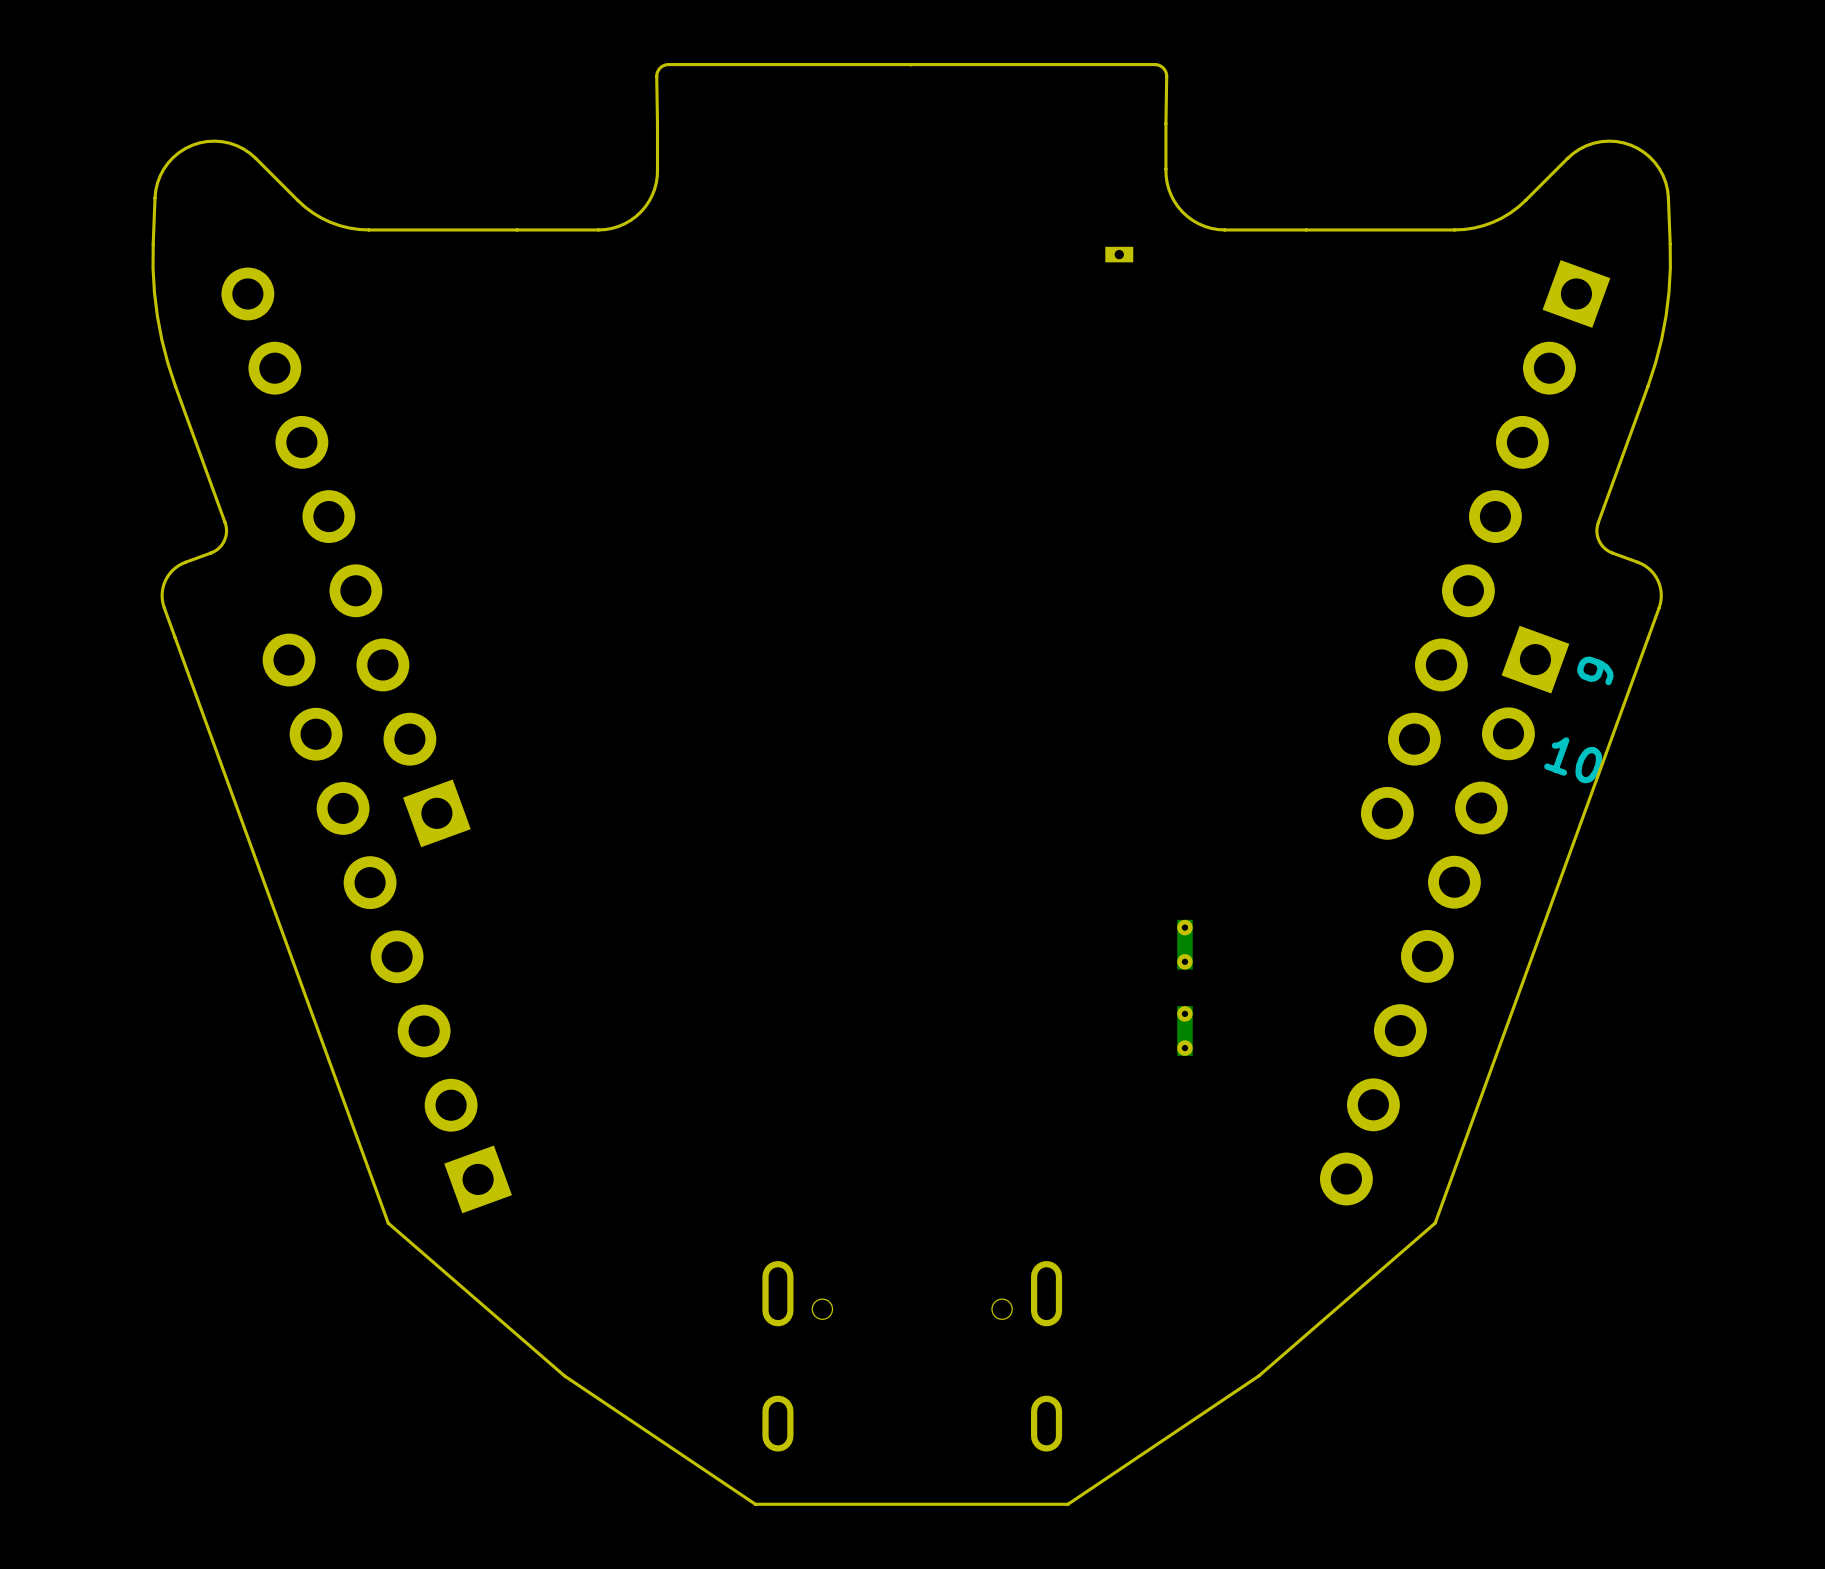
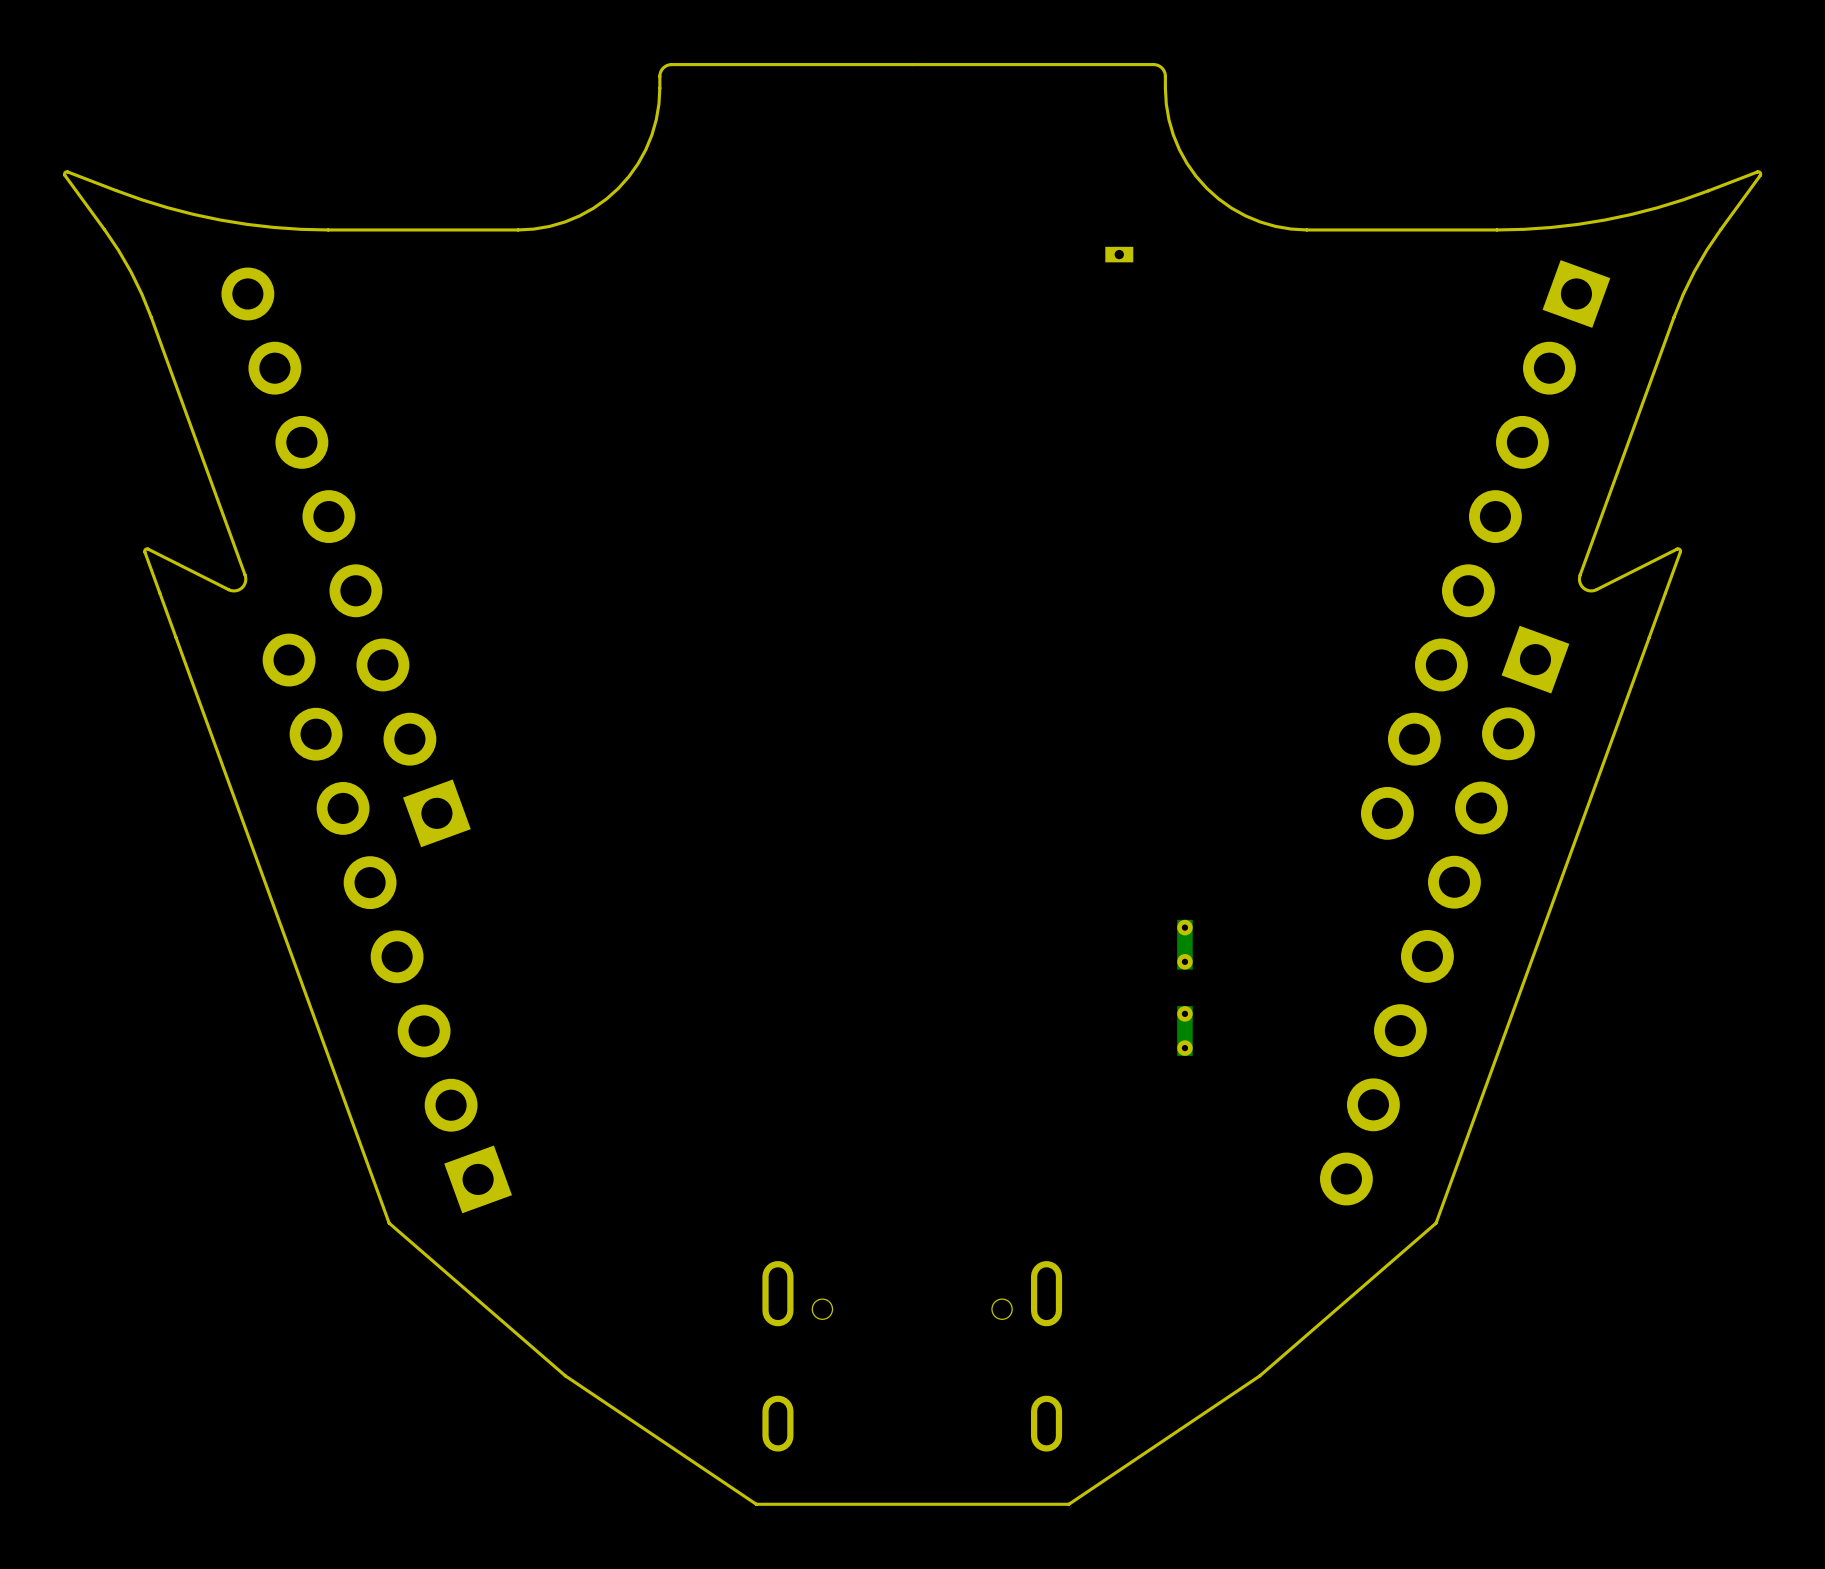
board edge: (671, 64) (662, 66) (656, 73) (657, 175) (652, 195) (640, 212) (624, 223) (605, 229) (518, 229) -> (671, 64) (664, 67) (660, 73) (656, 119) (645, 149) (638, 163) (618, 188) (593, 208) (579, 215) (549, 226) (518, 229)
board edge: (1153, 64) (1162, 67) (1166, 73) (1166, 175) (1171, 195) (1182, 211) (1198, 223) (1217, 229) (1306, 229) -> (1153, 64) (1160, 67) (1164, 72) (1168, 119) (1179, 149) (1196, 176) (1206, 188) (1218, 198) (1245, 215) (1275, 226) (1306, 229)
board edge: (368, 229) (339, 225) (313, 213) (250, 153) (229, 143) (207, 141) (192, 145) (179, 152) (163, 169) (157, 182) (155, 197) (153, 268) (157, 316) (167, 363) (226, 530) (224, 540) (217, 549) (181, 563) (169, 573) (162, 592) (164, 607) (388, 1223) (564, 1375) (756, 1504) -> (368, 229) (301, 229) (220, 220) (167, 207) (67, 171) (64, 173) (118, 250) (141, 294) (245, 575) (245, 580) (242, 586) (236, 590) (231, 590) (148, 549) (144, 550) (389, 1223) (565, 1375) (756, 1504)
board edge: (1454, 229) (1483, 225) (1510, 212) (1573, 153) (1593, 143) (1608, 141) (1630, 145) (1644, 152) (1659, 169) (1665, 182) (1668, 197) (1670, 267) (1666, 316) (1655, 363) (1596, 530) (1599, 540) (1605, 549) (1641, 563) (1653, 573) (1661, 592) (1659, 607) (1435, 1223) (1258, 1375) (1067, 1504) -> (1454, 229) (1524, 229) (1604, 220) (1657, 207) (1757, 171) (1760, 173) (1706, 250) (1683, 294) (1580, 575) (1579, 582) (1582, 587) (1588, 590) (1594, 590) (1677, 549) (1680, 550) (1436, 1223) (1259, 1375) (1067, 1504)
text: 9 (1595, 670) -> none
text: 10 (1573, 760) -> none

